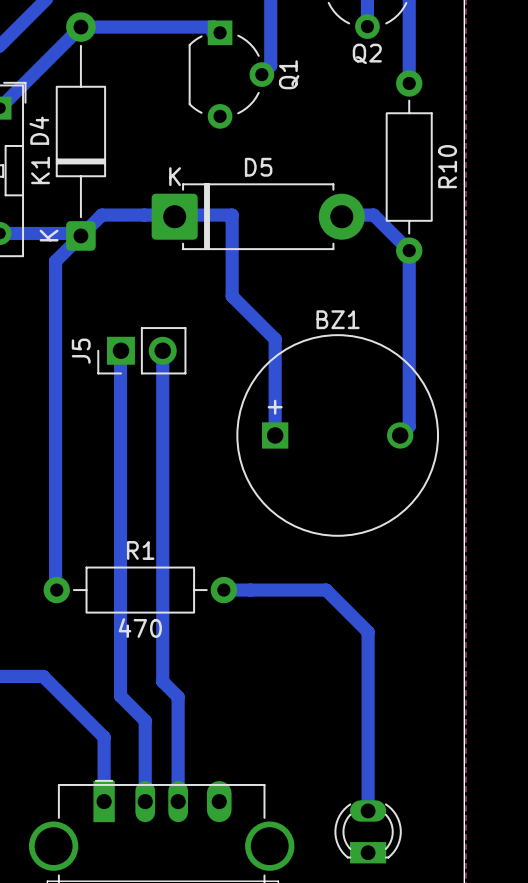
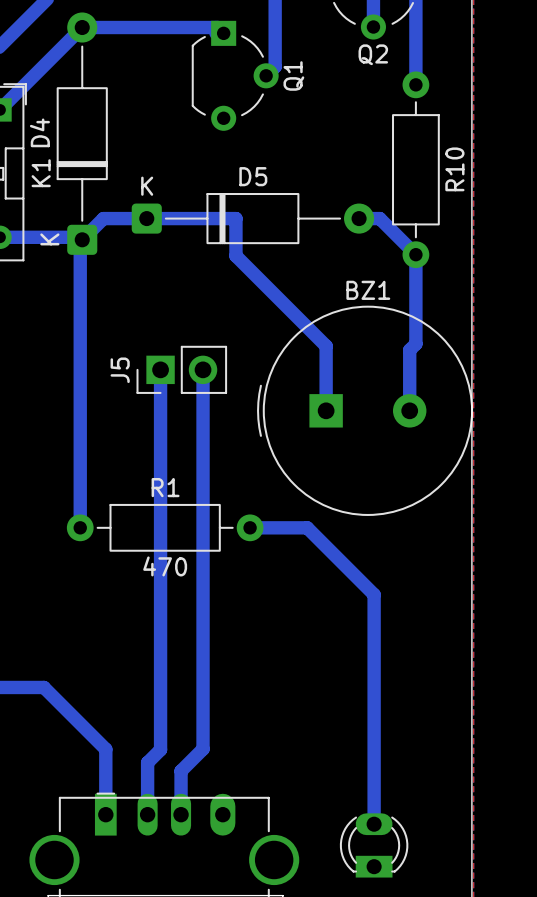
D5 footprint: [151, 183, 365, 251] -> [131, 193, 375, 245]
bottom track: (78, 237) (55, 261) (56, 590) -> (80, 241) (80, 527)
bottom track: (232, 251) (232, 296) (275, 339) (275, 435) -> (235, 255) (326, 346) (326, 410)
BZ1 footprint: [236, 334, 439, 537] -> [257, 305, 474, 516]
bottom track: (409, 338) (409, 426) (400, 435) -> (415, 343) (409, 350) (409, 410)
bottom track: (120, 350) (120, 696) (145, 720) (145, 750) -> (160, 369) (160, 749) (147, 762)
J5 position: (141, 350) -> (181, 369)
bottom track: (162, 350) (162, 681) (178, 696) (178, 758) -> (203, 369) (203, 749) (181, 771)
R1 position: (140, 590) -> (165, 527)
bottom track: (223, 590) (326, 590) (368, 632) -> (250, 527) (307, 527) (374, 594) (374, 642)

